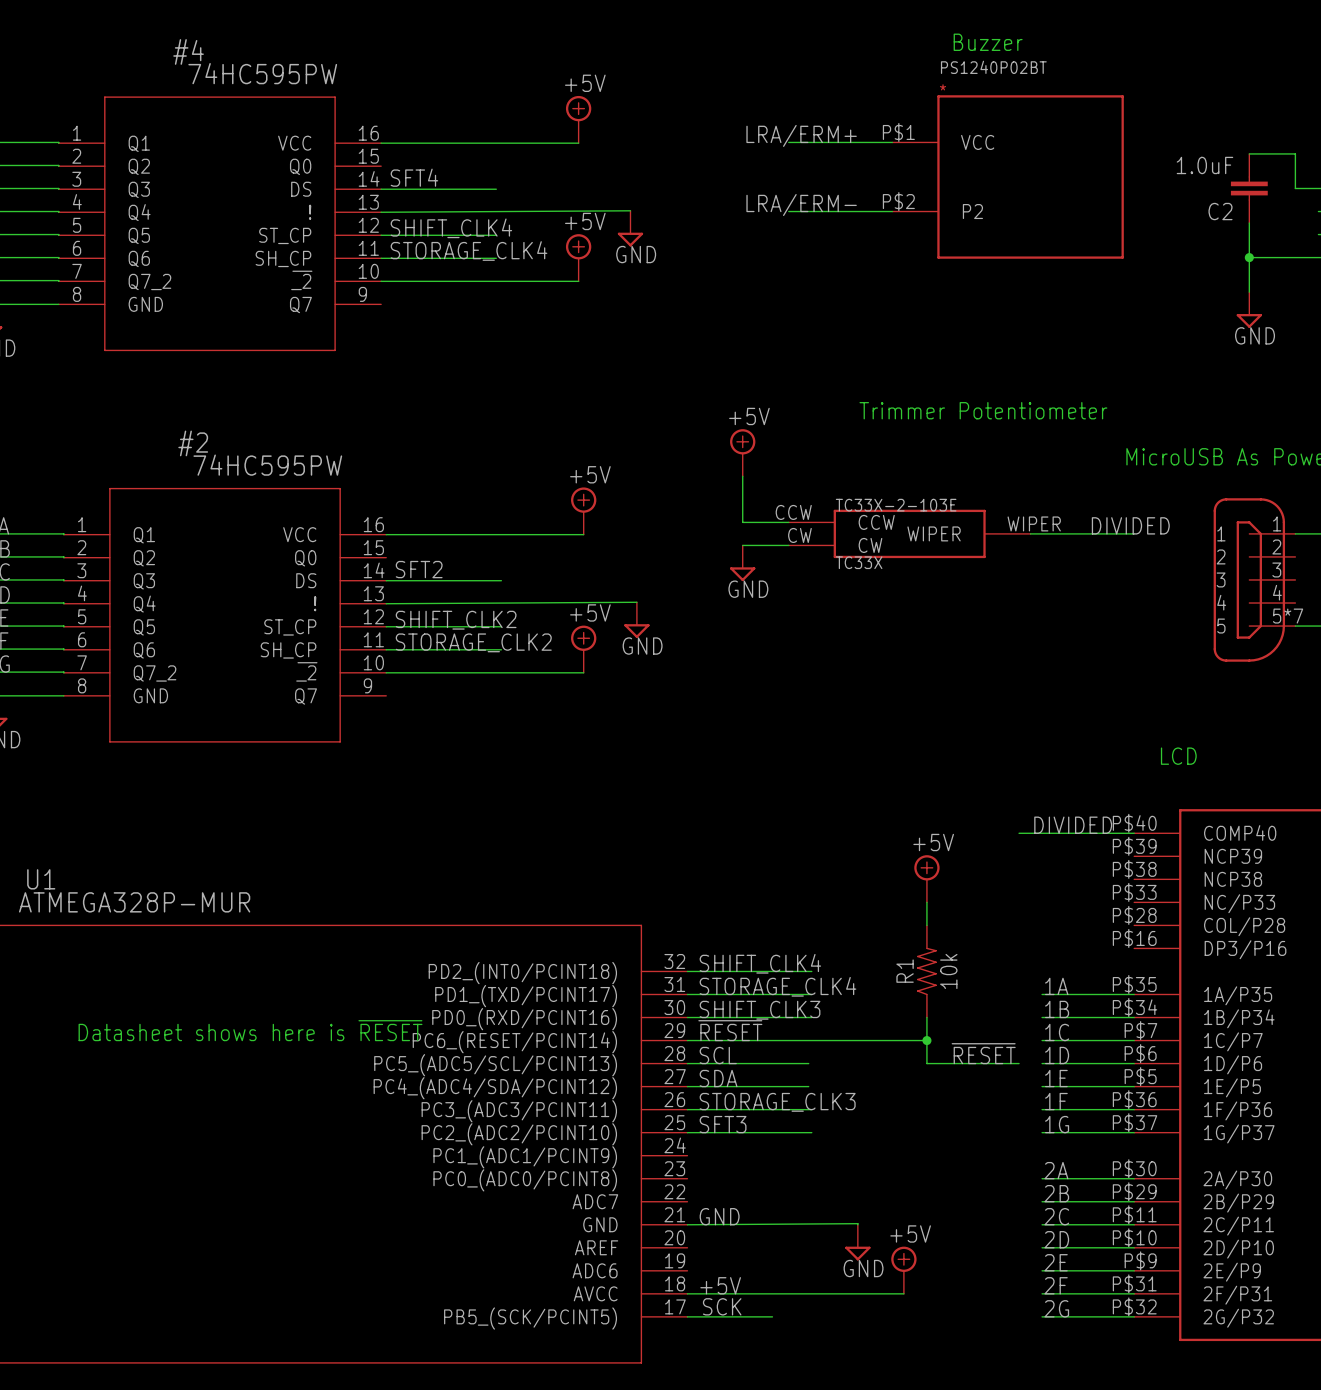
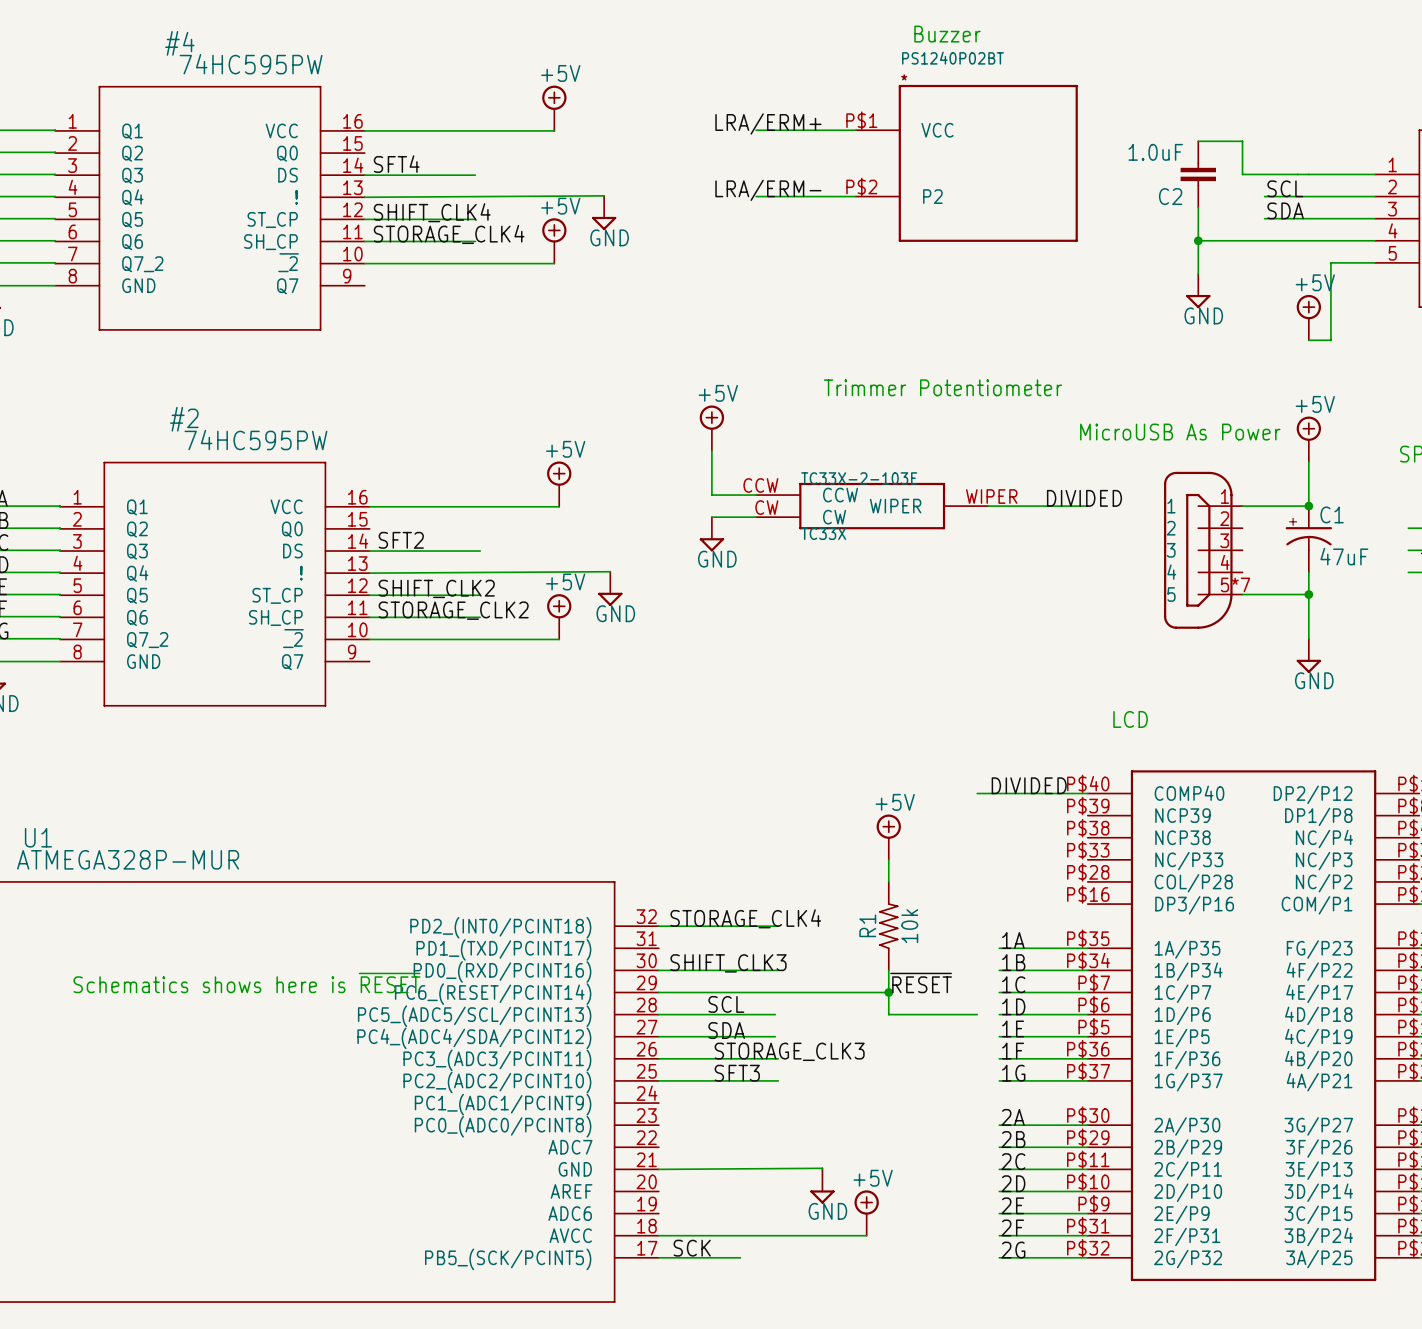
label: SHIFT_CLK4 (760, 963) -> STORAGE_CLK4 (745, 918)
label: STORAGE_CLK4 (777, 986) -> none
wire: (687, 994) (811, 994) -> none
text: Datasheet shows here is ~{RESET} (250, 1030) -> Schematics shows here is ~{RESET} (246, 982)
label: ~{RESET} (730, 1030) -> none
label position: ~{RESET} (983, 1053) -> ~{RESET} (921, 982)
label position: SCL (718, 1055) -> SCL (726, 1004)
label position: SDA (718, 1078) -> SDA (726, 1030)
label position: STORAGE_CLK3 (777, 1102) -> STORAGE_CLK3 (789, 1051)
label position: SFT3 (723, 1124) -> SFT3 (737, 1073)
label: GND (719, 1216) -> none
label: +5V (720, 1285) -> none

